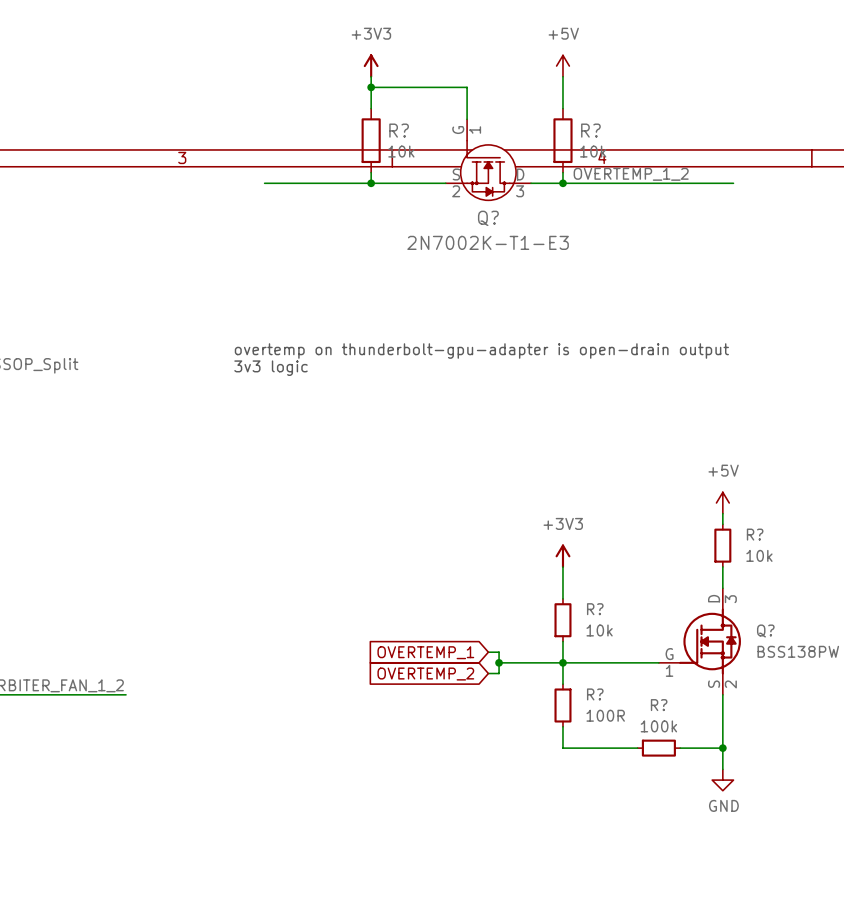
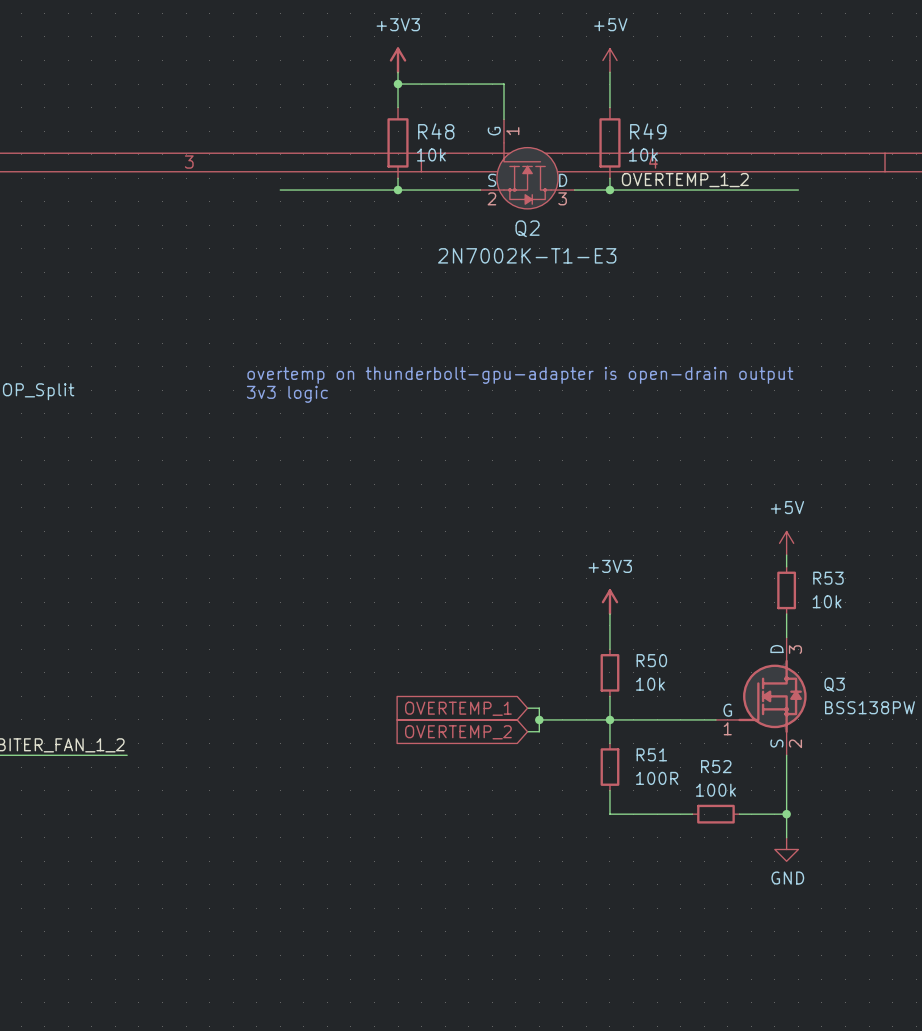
R? name: R? (399, 130) -> R48 (436, 131)
R? name: R? (590, 130) -> R49 (648, 131)
Q? name: Q? (488, 218) -> Q2 (527, 228)
R? name: R? (755, 534) -> R53 (828, 578)
R? name: R? (595, 609) -> R50 (651, 660)
Q? name: Q? (765, 631) -> Q3 (834, 684)
R? name: R? (595, 694) -> R51 (651, 754)
R? name: R? (659, 705) -> R52 (716, 766)

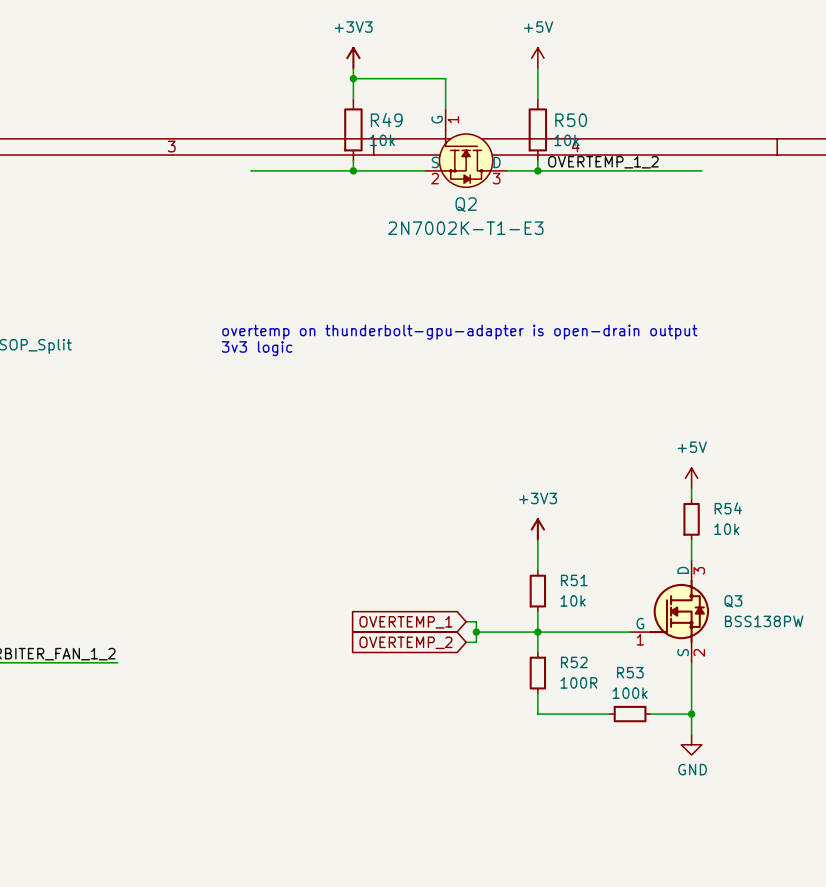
R48 name: R48 (436, 131) -> R49 (386, 119)
R49 name: R49 (648, 131) -> R50 (571, 120)
R53 name: R53 (828, 578) -> R54 (728, 508)
R50 name: R50 (651, 660) -> R51 (574, 580)
R51 name: R51 (651, 754) -> R52 (574, 662)
R52 name: R52 (716, 766) -> R53 (630, 672)

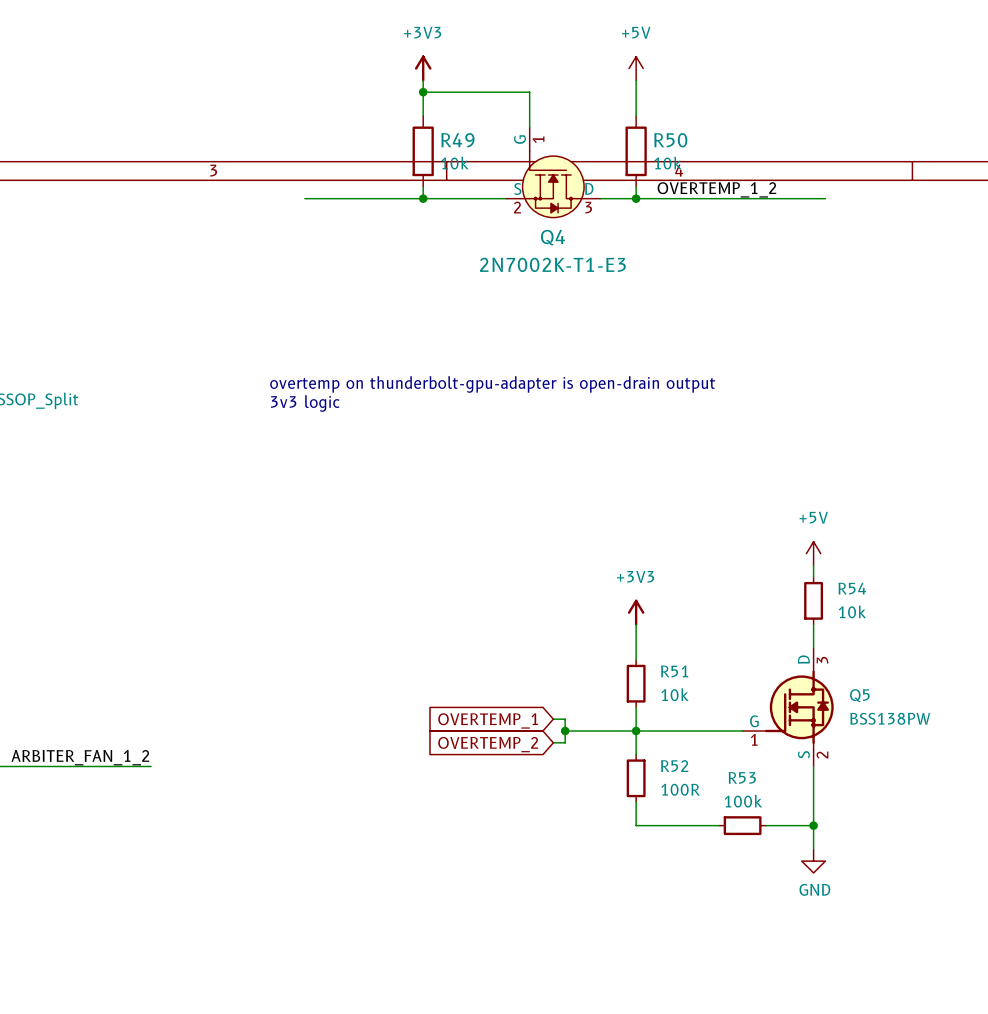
Q2 name: Q2 (466, 204) -> Q4 (552, 237)
Q3 name: Q3 (733, 601) -> Q5 (859, 695)

